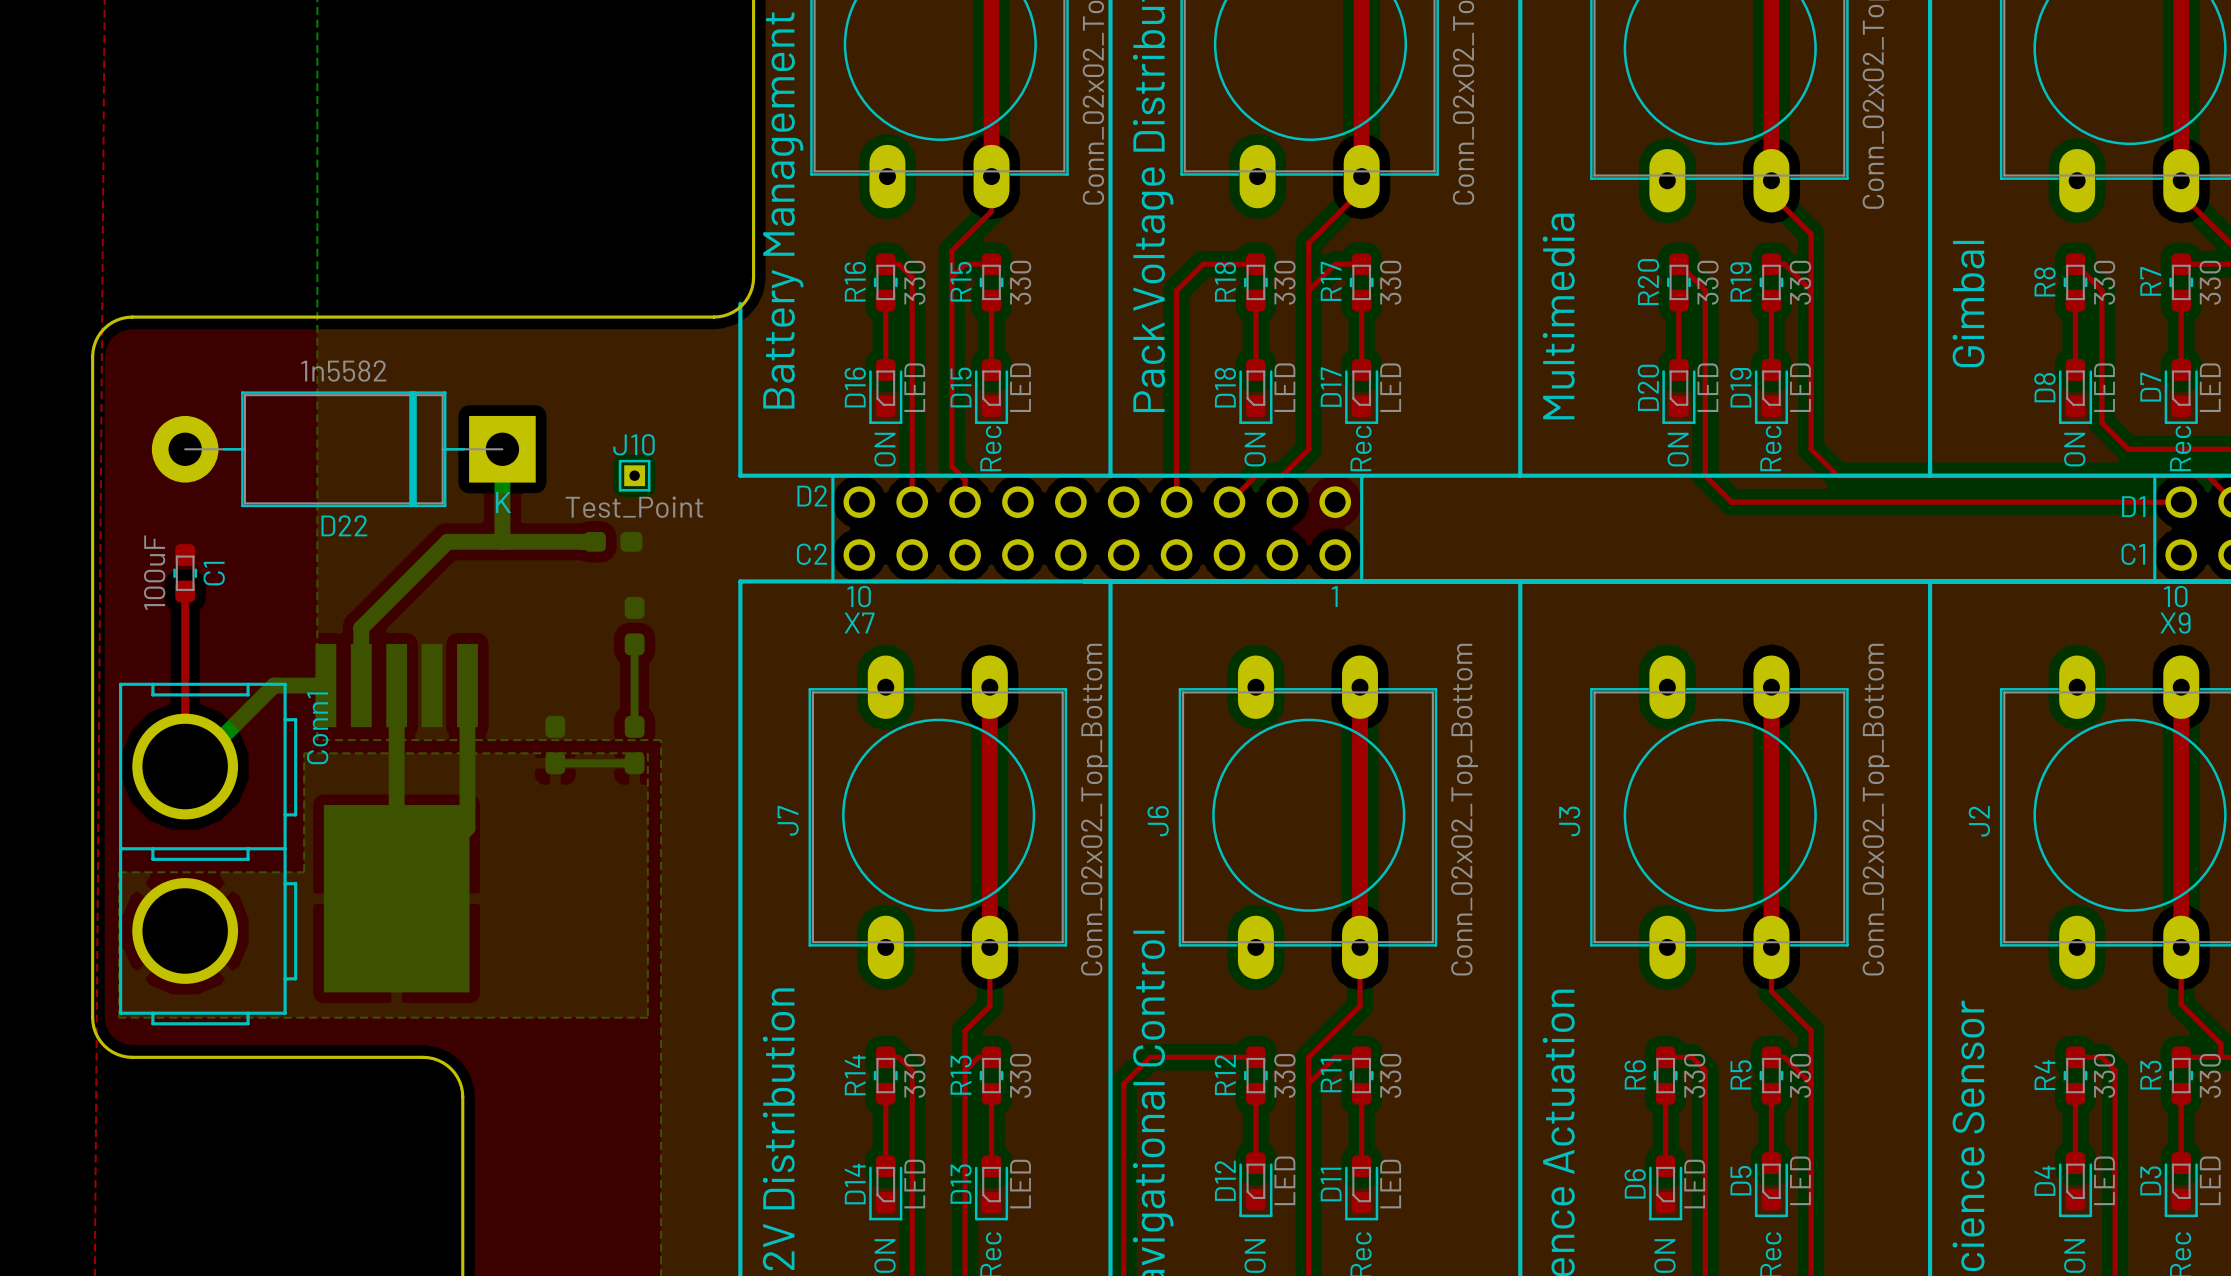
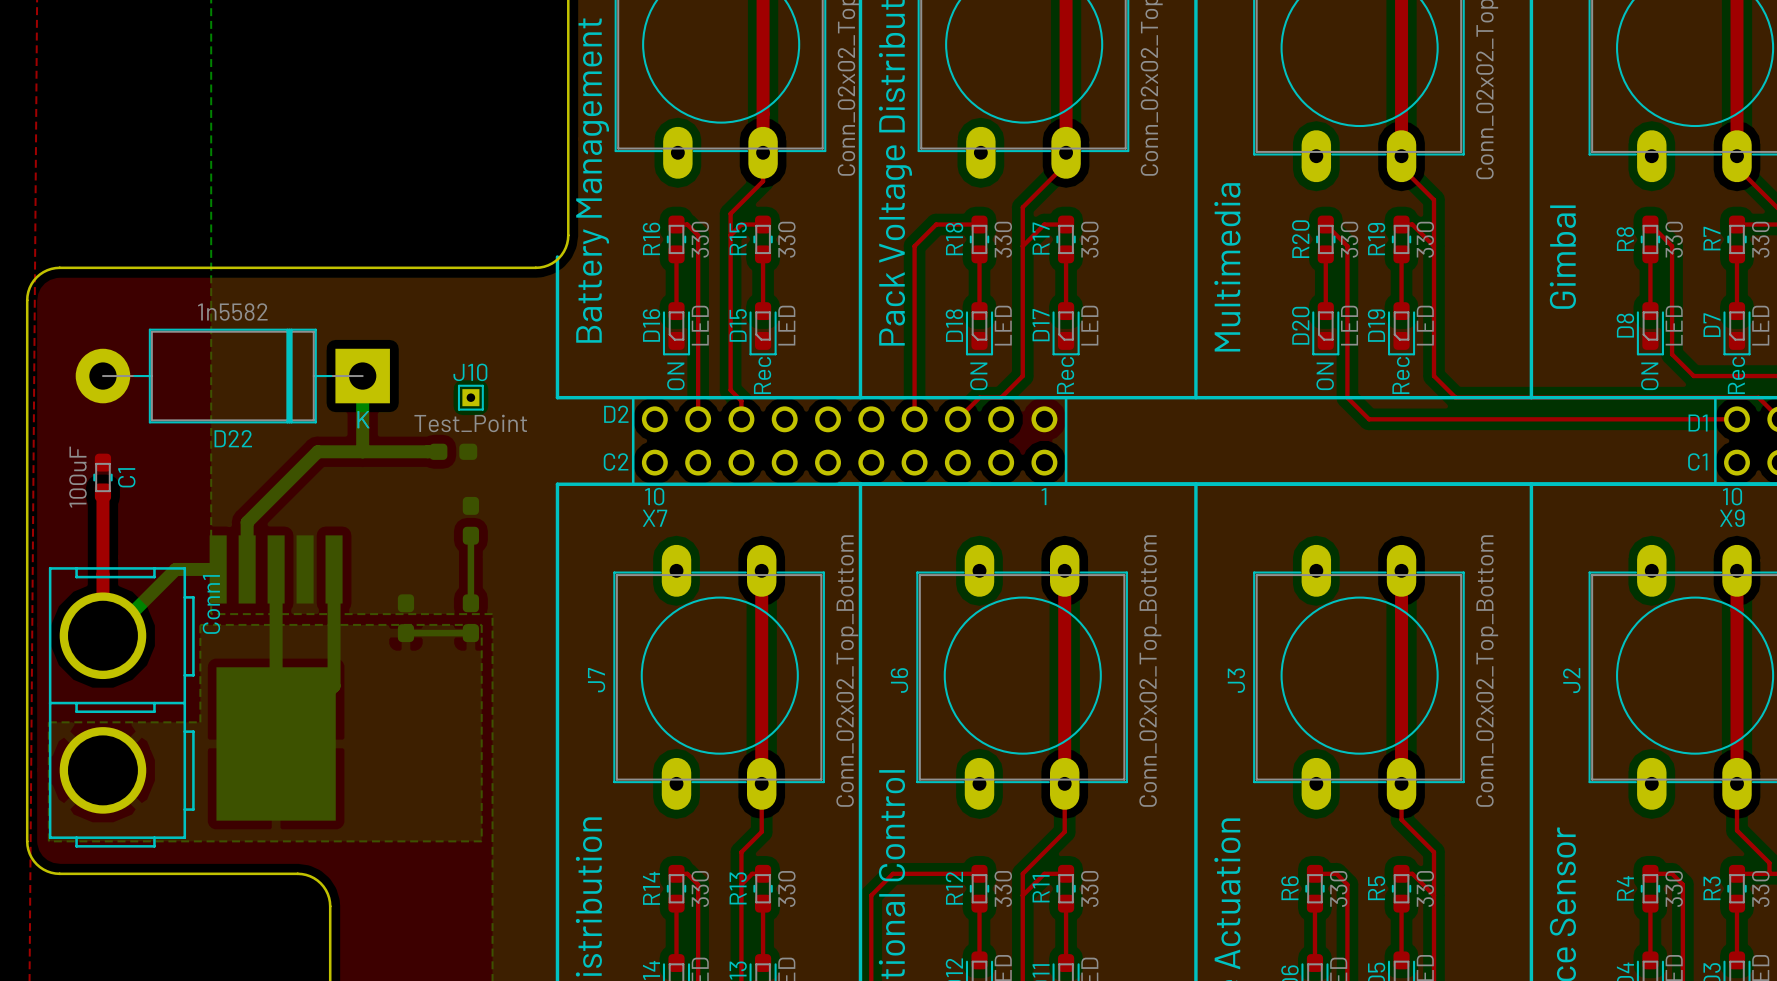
top track width: thin (185, 591) (185, 766) -> thick (102, 492) (102, 635)

